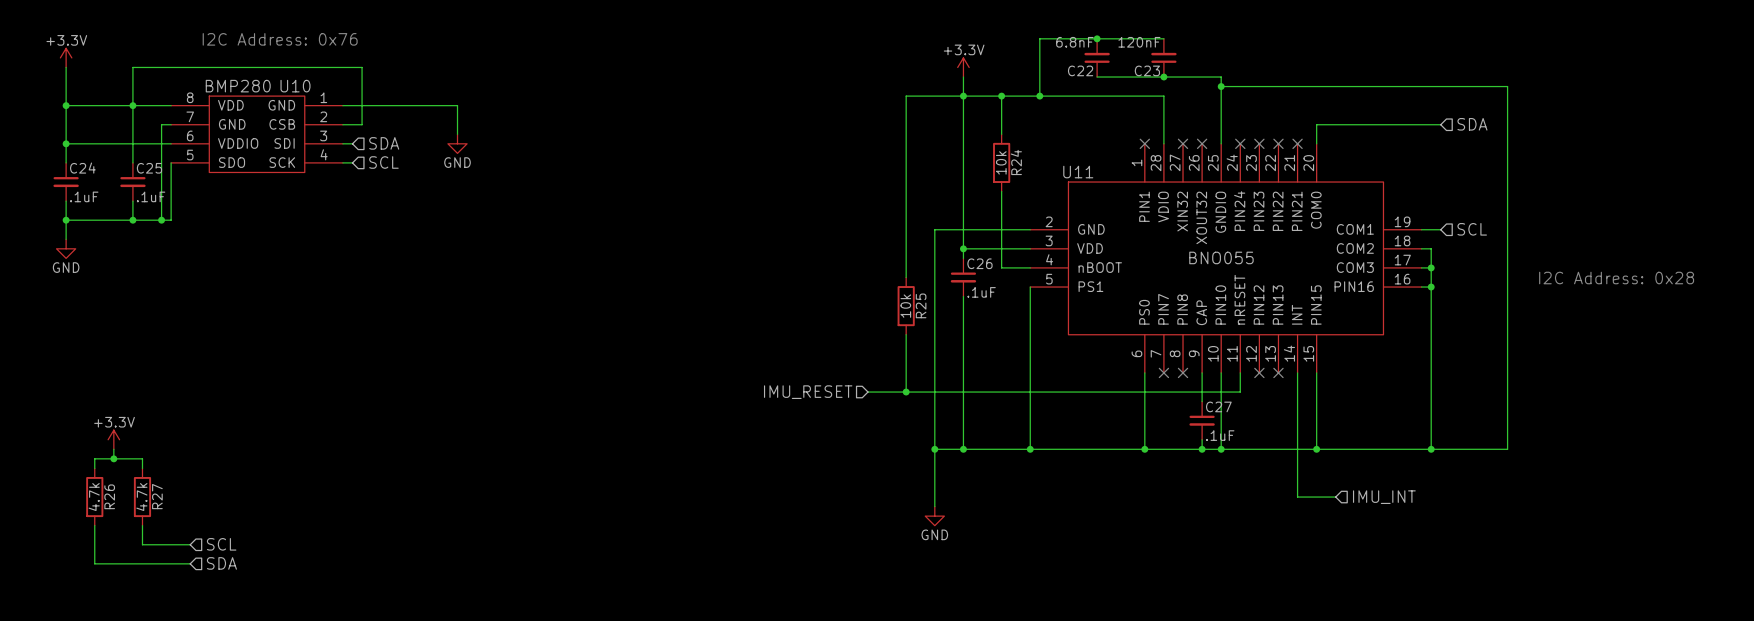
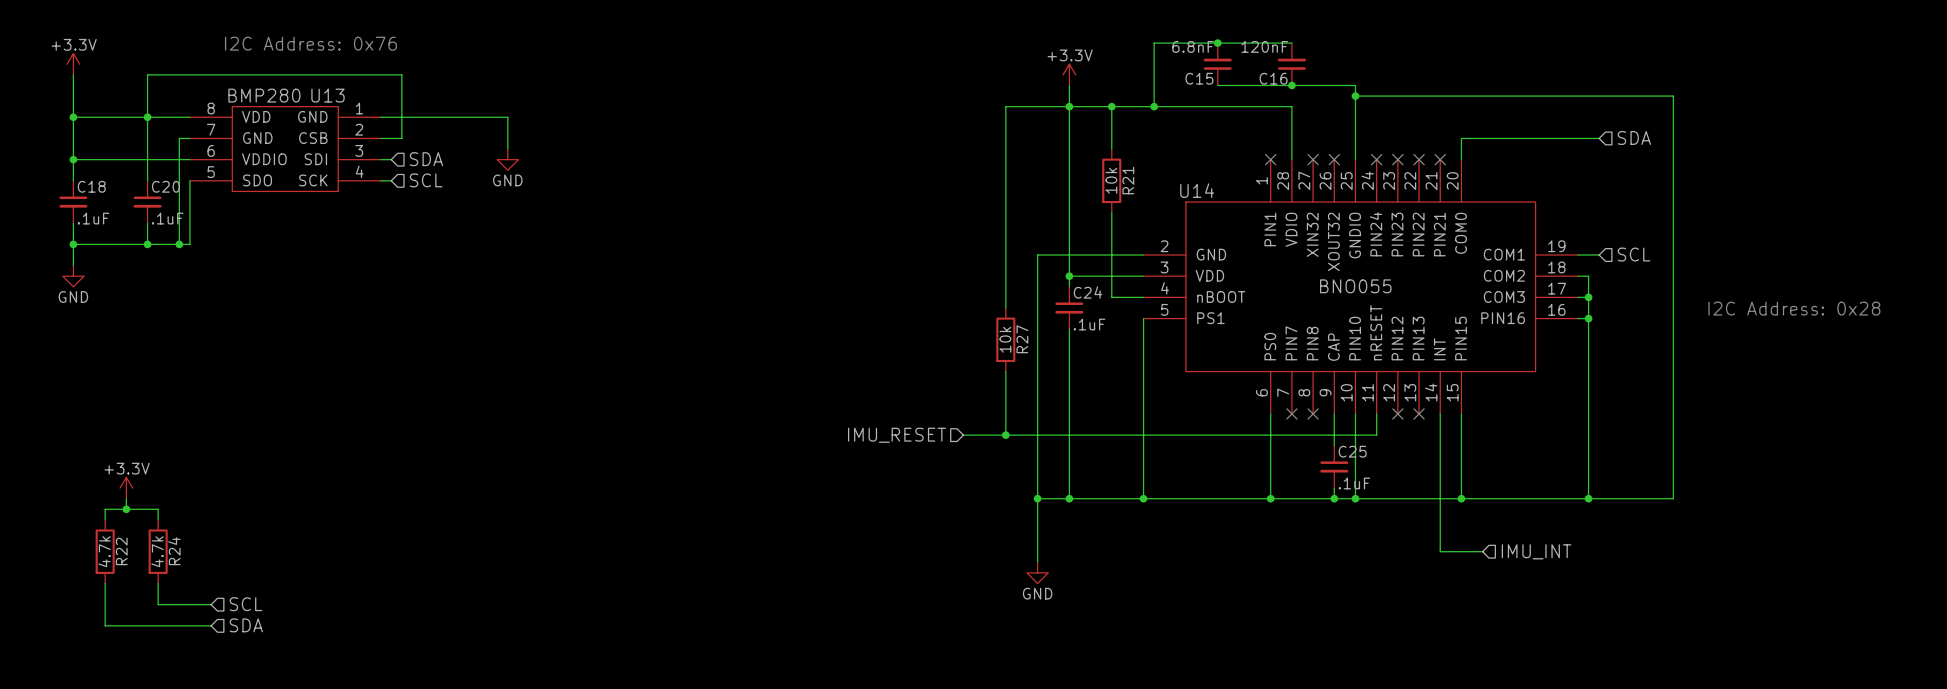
C22 name: C22 (1080, 70) -> C15 (1199, 78)
C23 name: C23 (1147, 70) -> C16 (1273, 78)
U10 name: U10 (295, 86) -> U13 (327, 95)
R24 name: R24 (1016, 162) -> R21 (1128, 180)
C24 name: C24 (82, 168) -> C18 (91, 186)
C25 name: C25 (149, 168) -> C20 (165, 186)
U11 name: U11 (1078, 172) -> U14 (1197, 190)
C26 name: C26 (979, 263) -> C24 (1087, 292)
R25 name: R25 (921, 305) -> R27 (1022, 339)
C27 name: C27 (1218, 406) -> C25 (1352, 451)
R26 name: R26 (109, 496) -> R22 (121, 551)
R27 name: R27 (157, 496) -> R24 (174, 551)

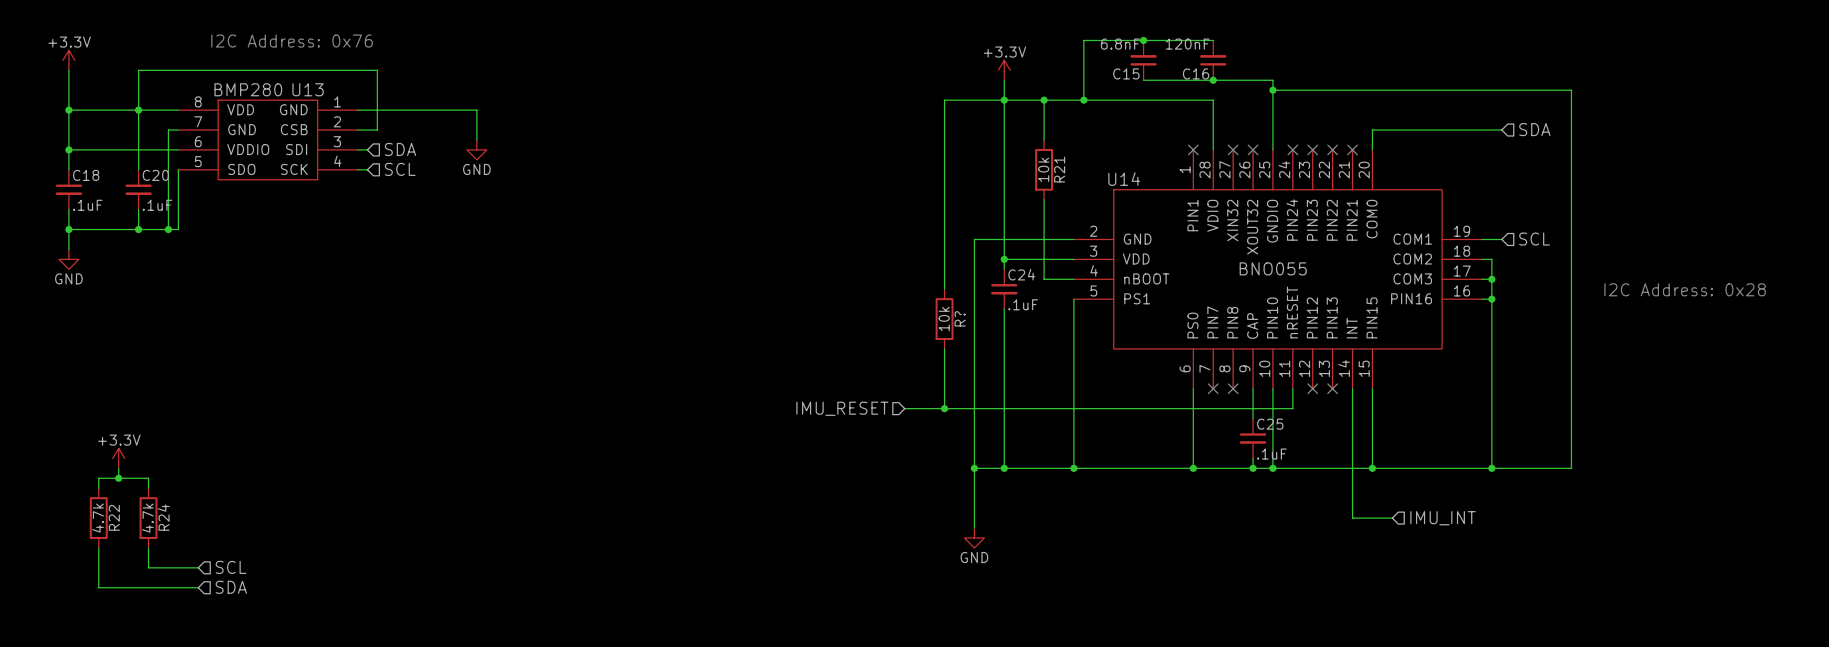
R27 name: R27 (1022, 339) -> R? (960, 318)

